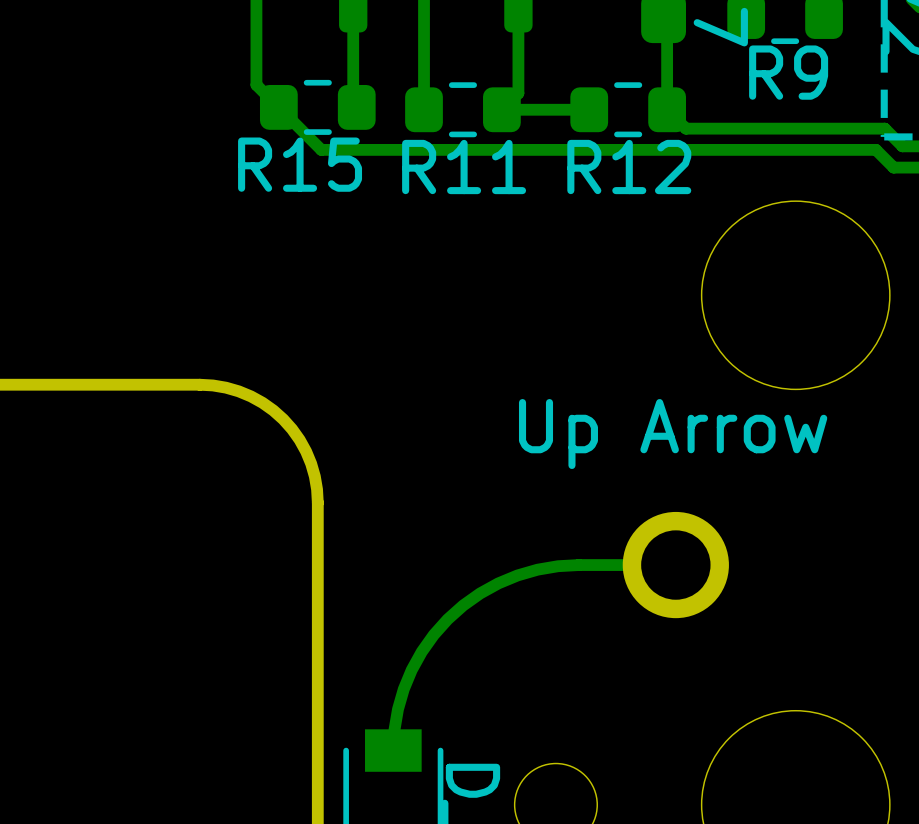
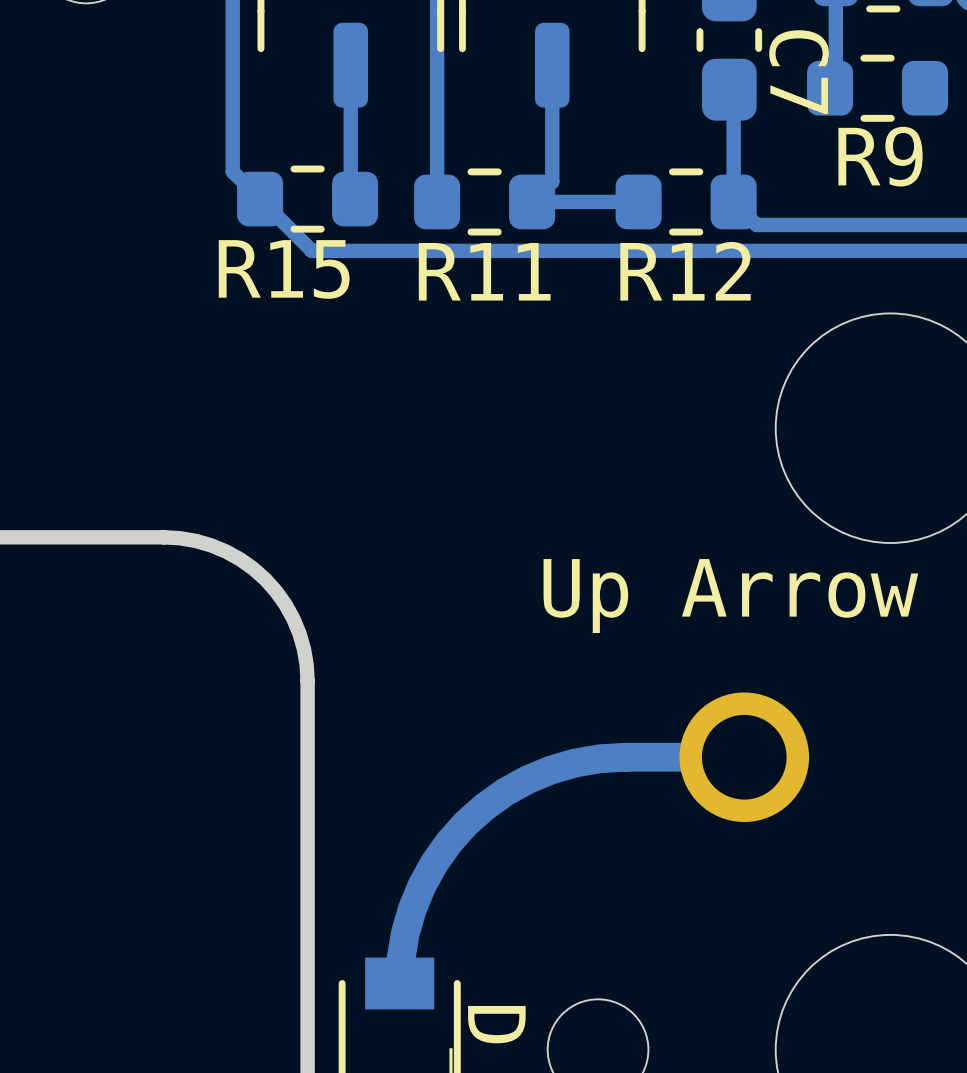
track width: thin (675, 565) (558, 566) (517, 575) (480, 593) (447, 619) (421, 651) (411, 670) (397, 709) (393, 750) -> thick (744, 757) (600, 758) (551, 769) (505, 791) (465, 823) (434, 863) (422, 885) (405, 933) (399, 983)

